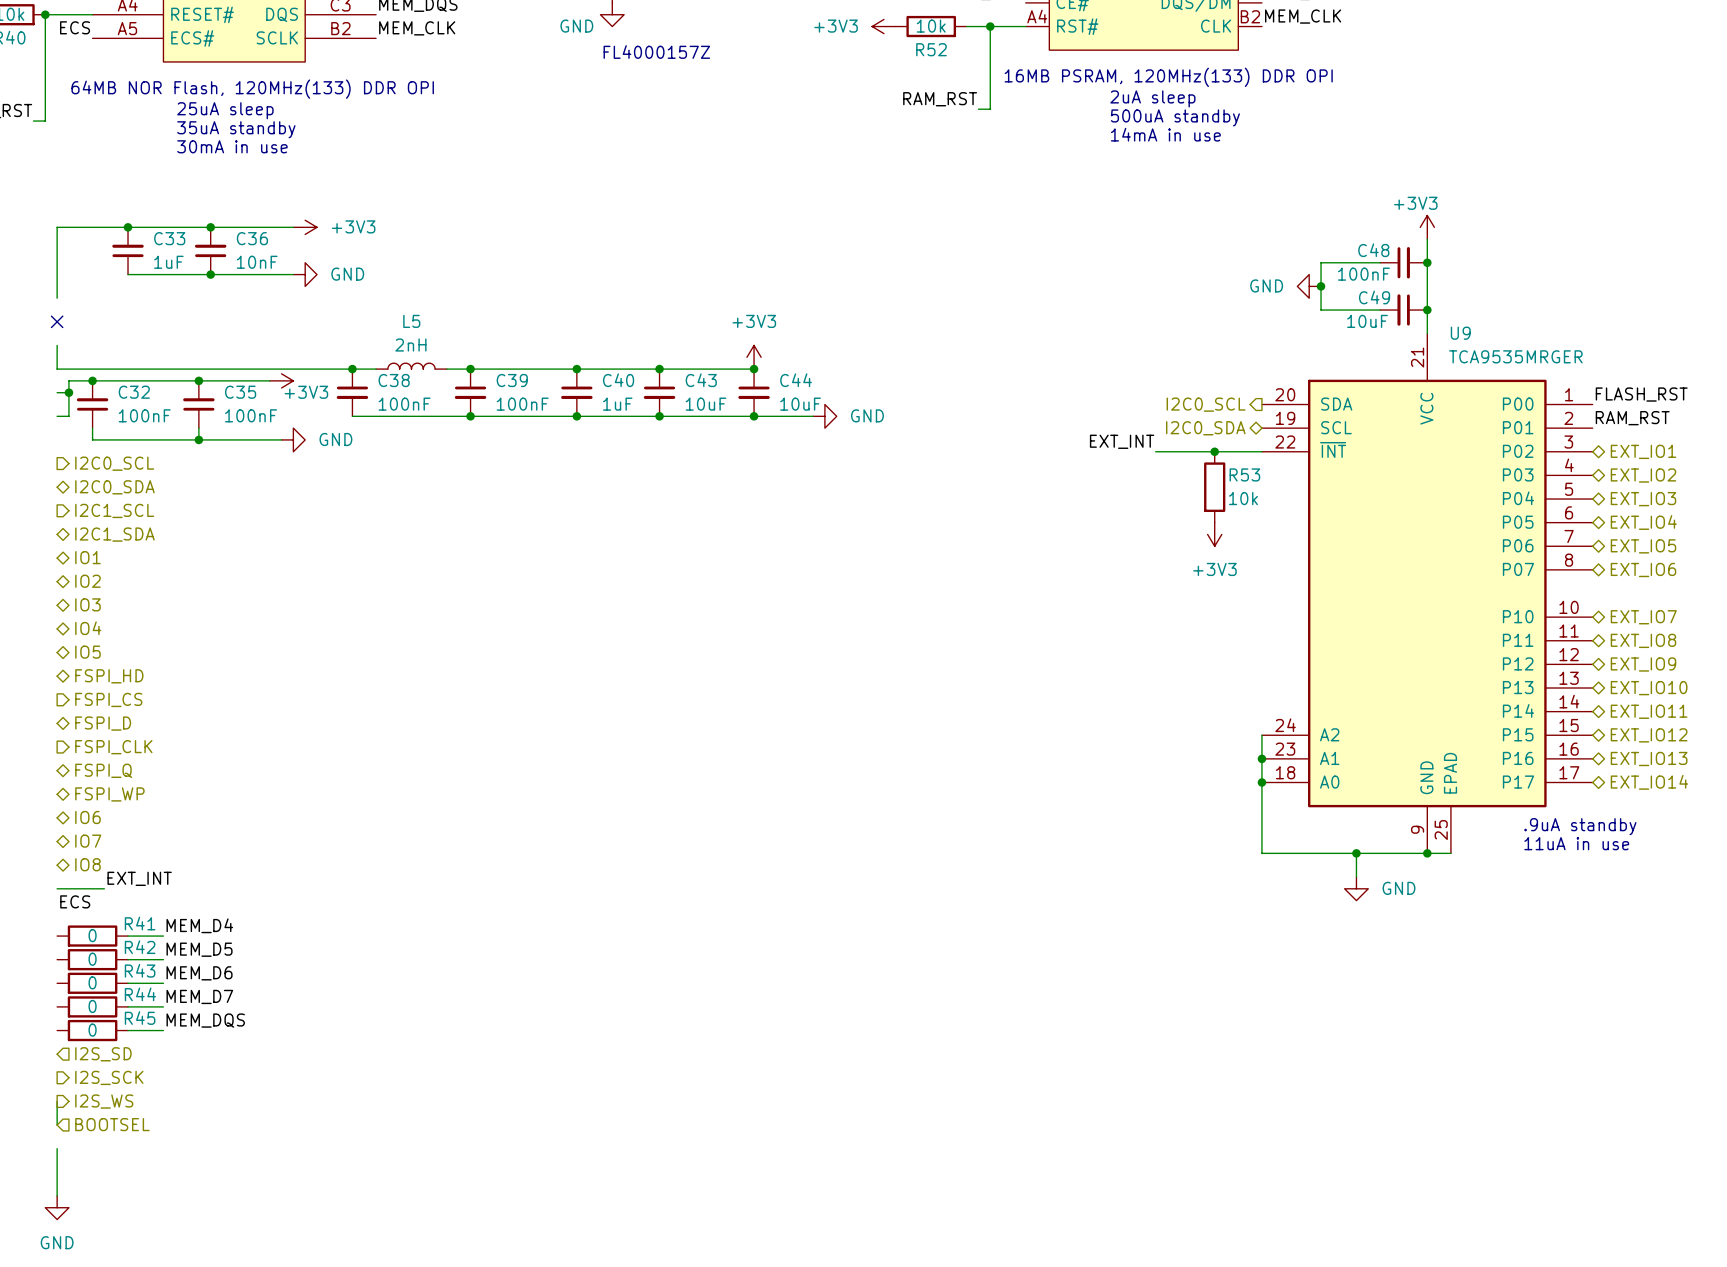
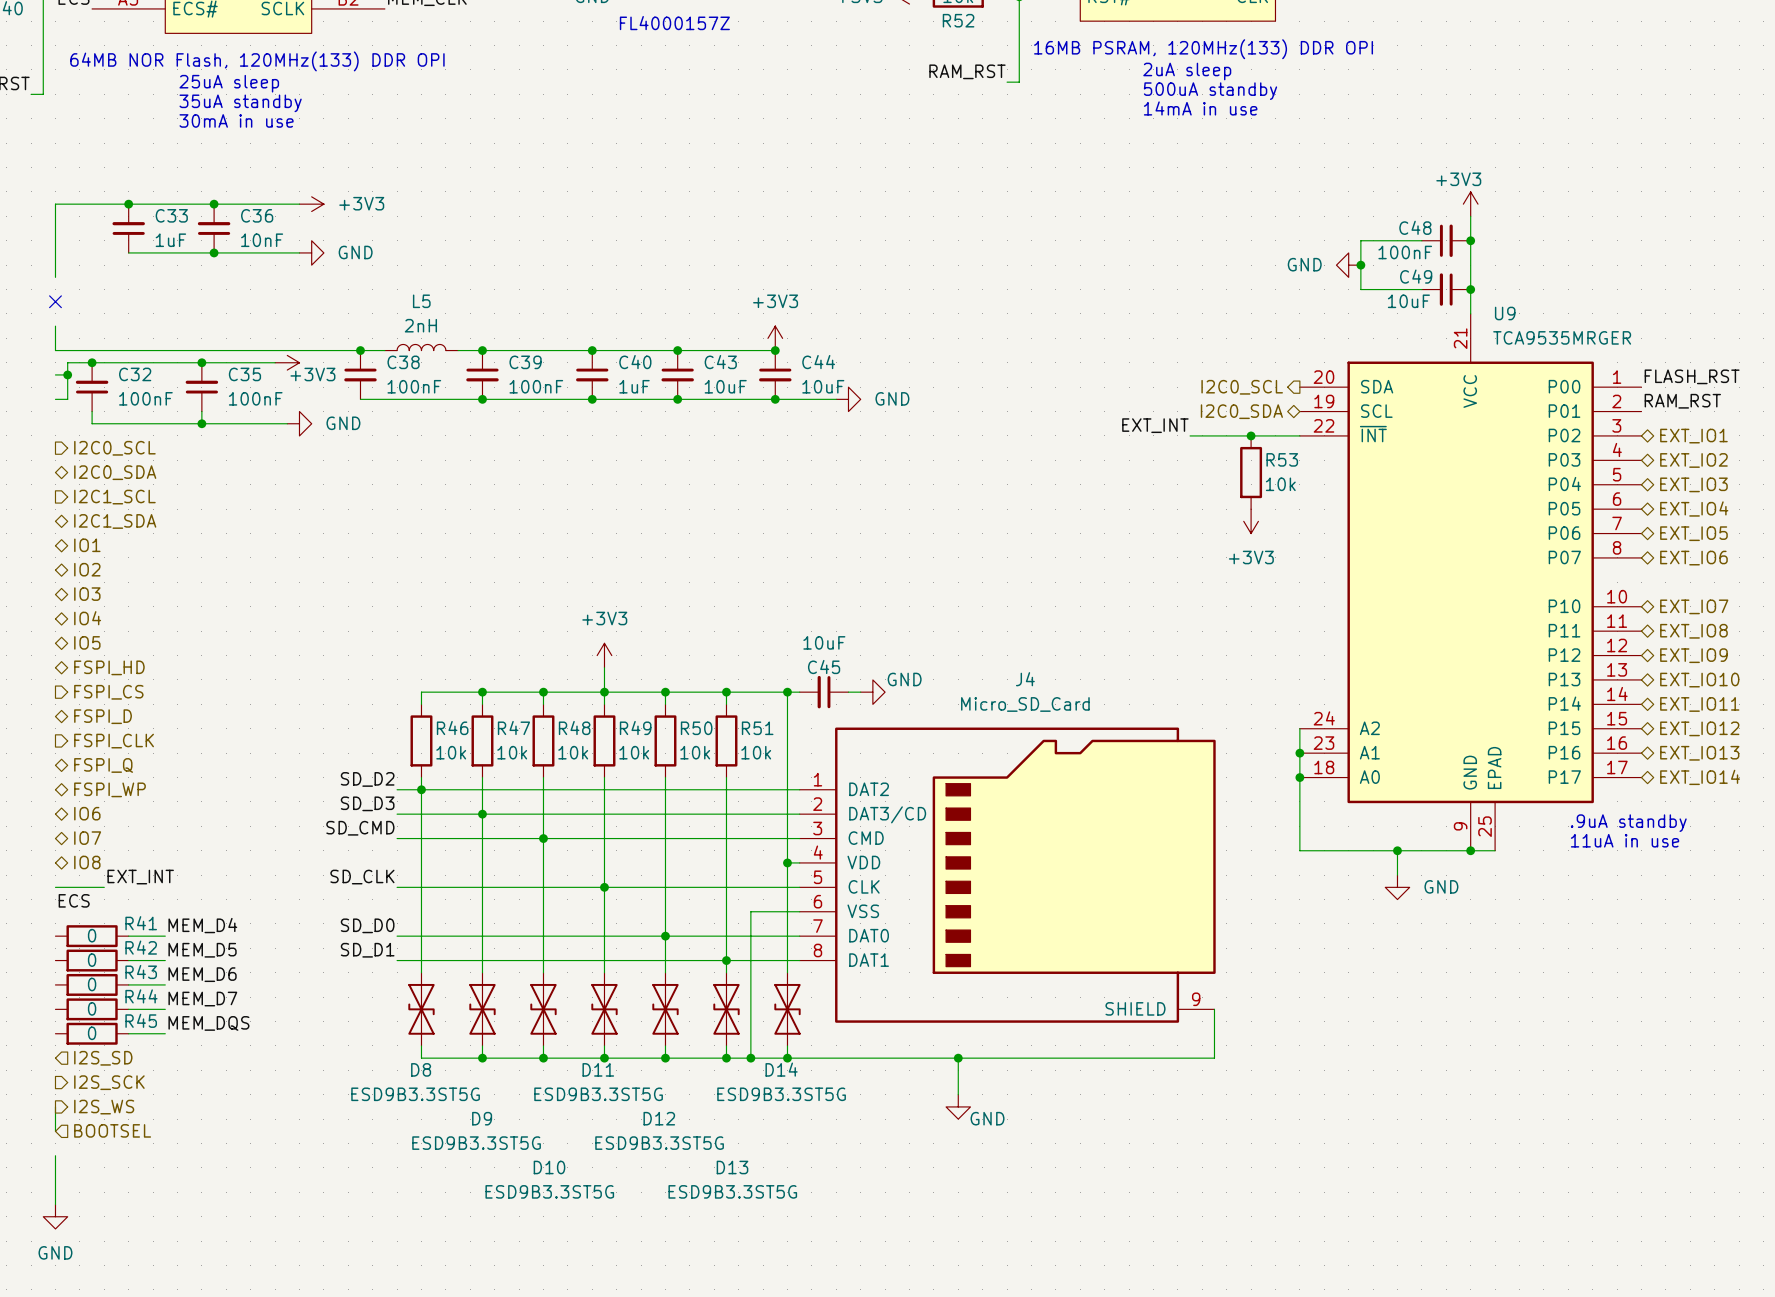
power symbol: none -> +3V3 (604, 655)
wire: none -> (604, 667) (604, 704)
wire: none -> (482, 692) (482, 704)
junction: none -> (482, 692)
wire: none -> (543, 692) (543, 704)
junction: none -> (543, 692)
junction: none -> (604, 692)
wire: none -> (665, 692) (665, 704)
junction: none -> (665, 692)
wire: none -> (726, 692) (726, 704)
junction: none -> (726, 692)
wire: none -> (787, 692) (787, 972)
junction: none -> (787, 692)
wire: none -> (799, 692) (421, 692) (421, 704)
C45: none -> 10uF (824, 692)
wire: none -> (848, 692) (860, 692)
power symbol: none -> GND (872, 692)
R46: none -> 10k (421, 740)
R47: none -> 10k (482, 740)
R48: none -> 10k (543, 740)
R49: none -> 10k (604, 740)
R50: none -> 10k (665, 740)
R51: none -> 10k (726, 740)
wire: none -> (421, 777) (421, 972)
wire: none -> (482, 777) (482, 972)
wire: none -> (543, 777) (543, 972)
wire: none -> (604, 777) (604, 972)
wire: none -> (665, 777) (665, 972)
wire: none -> (726, 777) (726, 972)
label: none -> SD_D2 (367, 779)
wire: none -> (397, 789) (799, 789)
junction: none -> (421, 789)
label: none -> SD_D3 (367, 803)
wire: none -> (397, 814) (799, 814)
junction: none -> (482, 814)
label: none -> SD_CMD (360, 828)
wire: none -> (397, 838) (799, 838)
junction: none -> (543, 838)
wire: none -> (787, 862) (799, 862)
junction: none -> (787, 862)
J4: none -> Micro_SD_Card (1007, 875)
label: none -> SD_CLK (362, 877)
wire: none -> (397, 887) (799, 887)
junction: none -> (604, 887)
wire: none -> (799, 911) (750, 911) (750, 1058)
label: none -> SD_D0 (367, 925)
wire: none -> (397, 936) (799, 936)
junction: none -> (665, 936)
label: none -> SD_D1 (367, 950)
wire: none -> (397, 960) (799, 960)
junction: none -> (726, 960)
D8: none -> ESD9B3.3ST5G (421, 1009)
D9: none -> ESD9B3.3ST5G (482, 1009)
D10: none -> ESD9B3.3ST5G (543, 1009)
D11: none -> ESD9B3.3ST5G (604, 1009)
D12: none -> ESD9B3.3ST5G (665, 1009)
D13: none -> ESD9B3.3ST5G (726, 1009)
D14: none -> ESD9B3.3ST5G (787, 1009)
wire: none -> (1214, 1009) (1214, 1058) (421, 1058) (421, 1045)
wire: none -> (482, 1045) (482, 1058)
wire: none -> (543, 1045) (543, 1058)
wire: none -> (604, 1045) (604, 1058)
wire: none -> (665, 1045) (665, 1058)
wire: none -> (726, 1045) (726, 1058)
wire: none -> (787, 1045) (787, 1058)
junction: none -> (482, 1058)
junction: none -> (543, 1058)
junction: none -> (604, 1058)
junction: none -> (665, 1058)
junction: none -> (726, 1058)
junction: none -> (750, 1058)
junction: none -> (787, 1058)
wire: none -> (958, 1058) (958, 1094)
junction: none -> (958, 1058)
power symbol: none -> GND (958, 1106)

